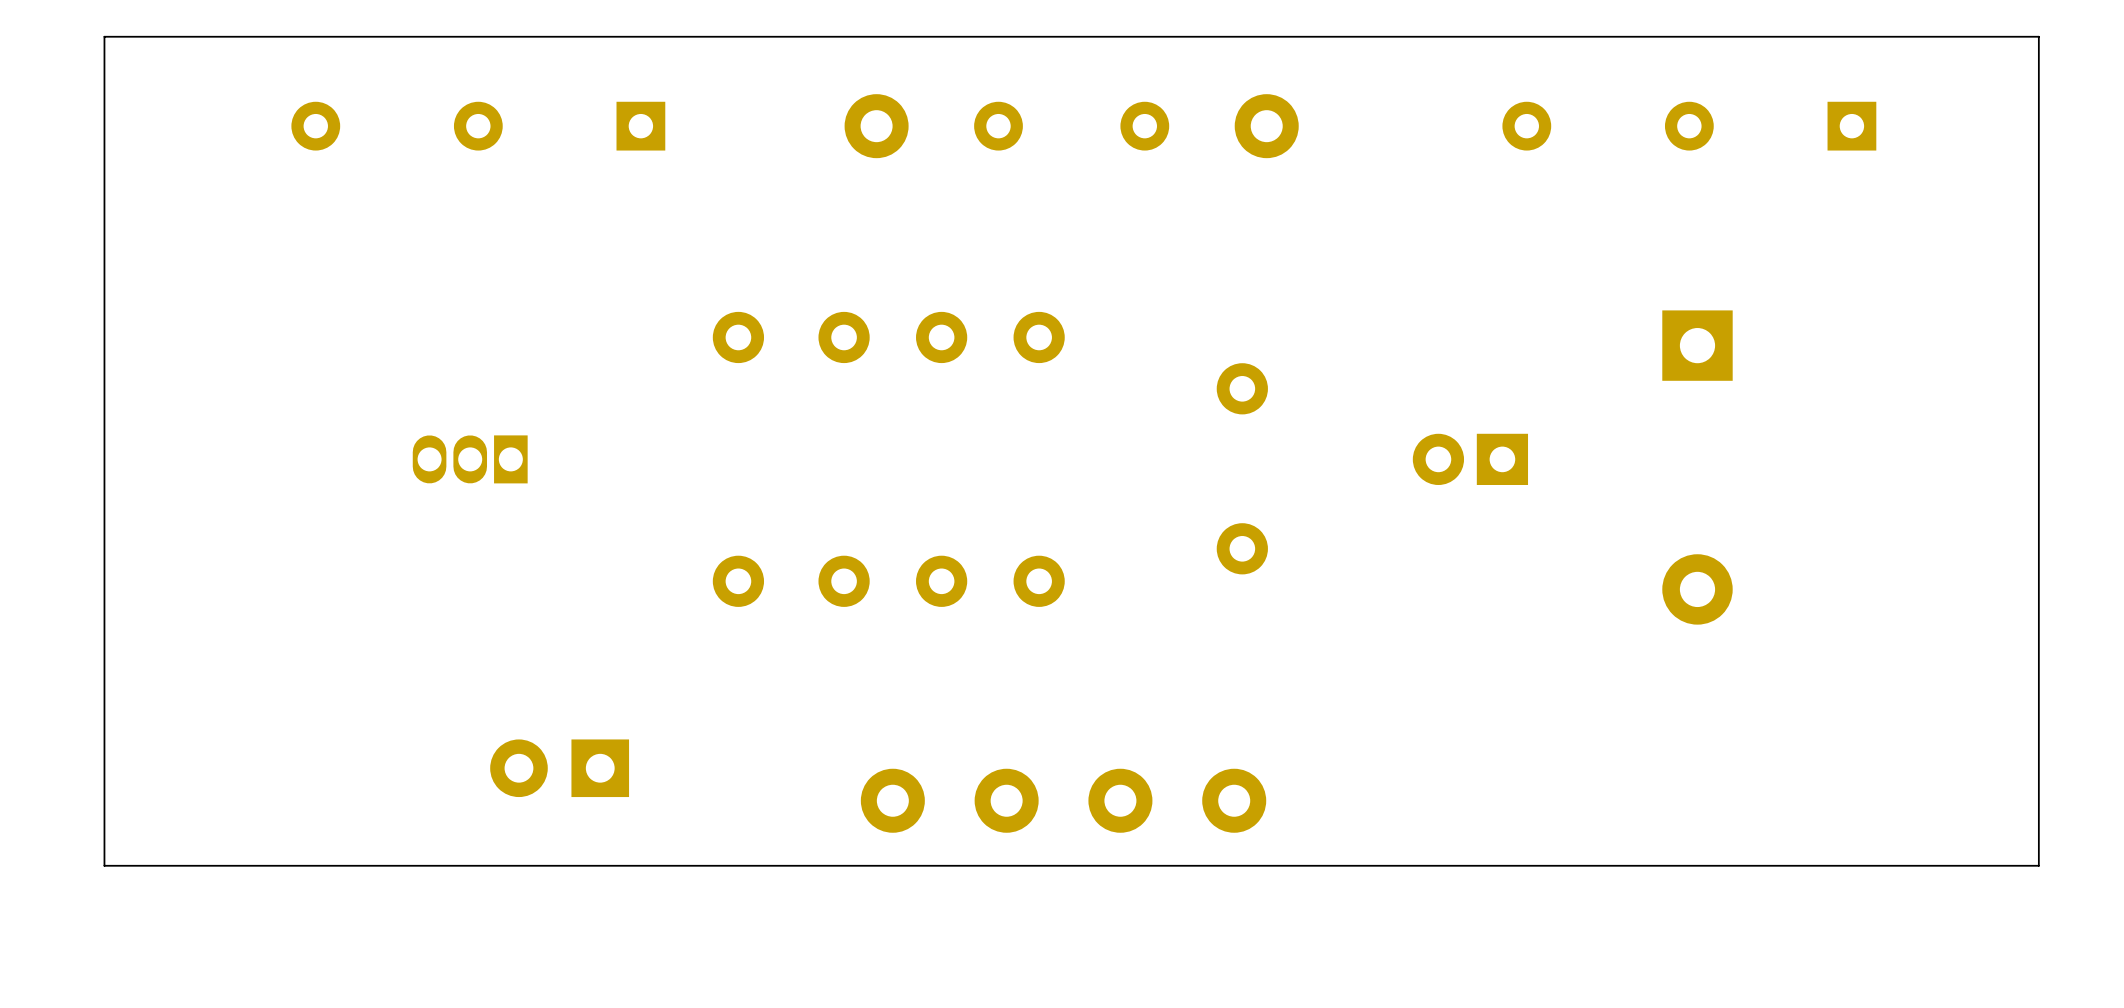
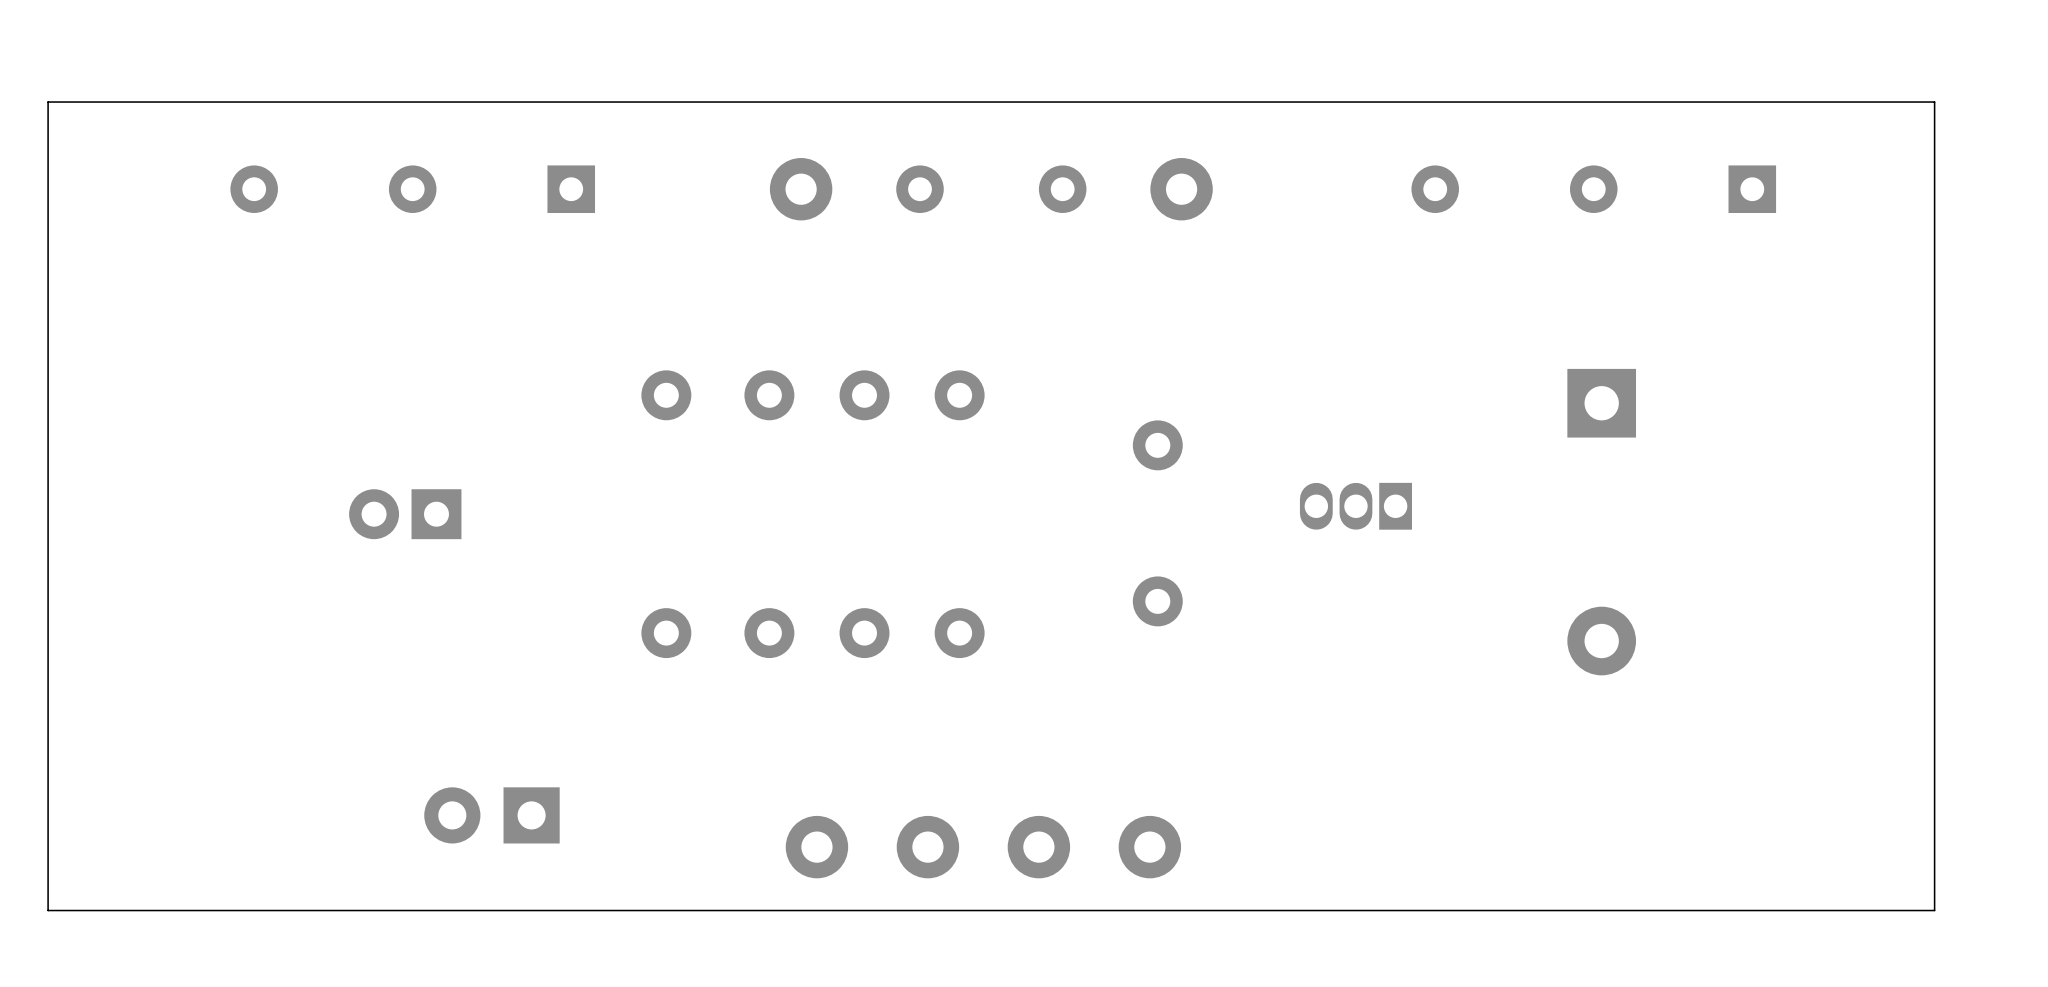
part footprint: [1412, 433, 1529, 485] -> [1299, 482, 1412, 530]
part footprint: [412, 435, 528, 484] -> [349, 489, 462, 540]

